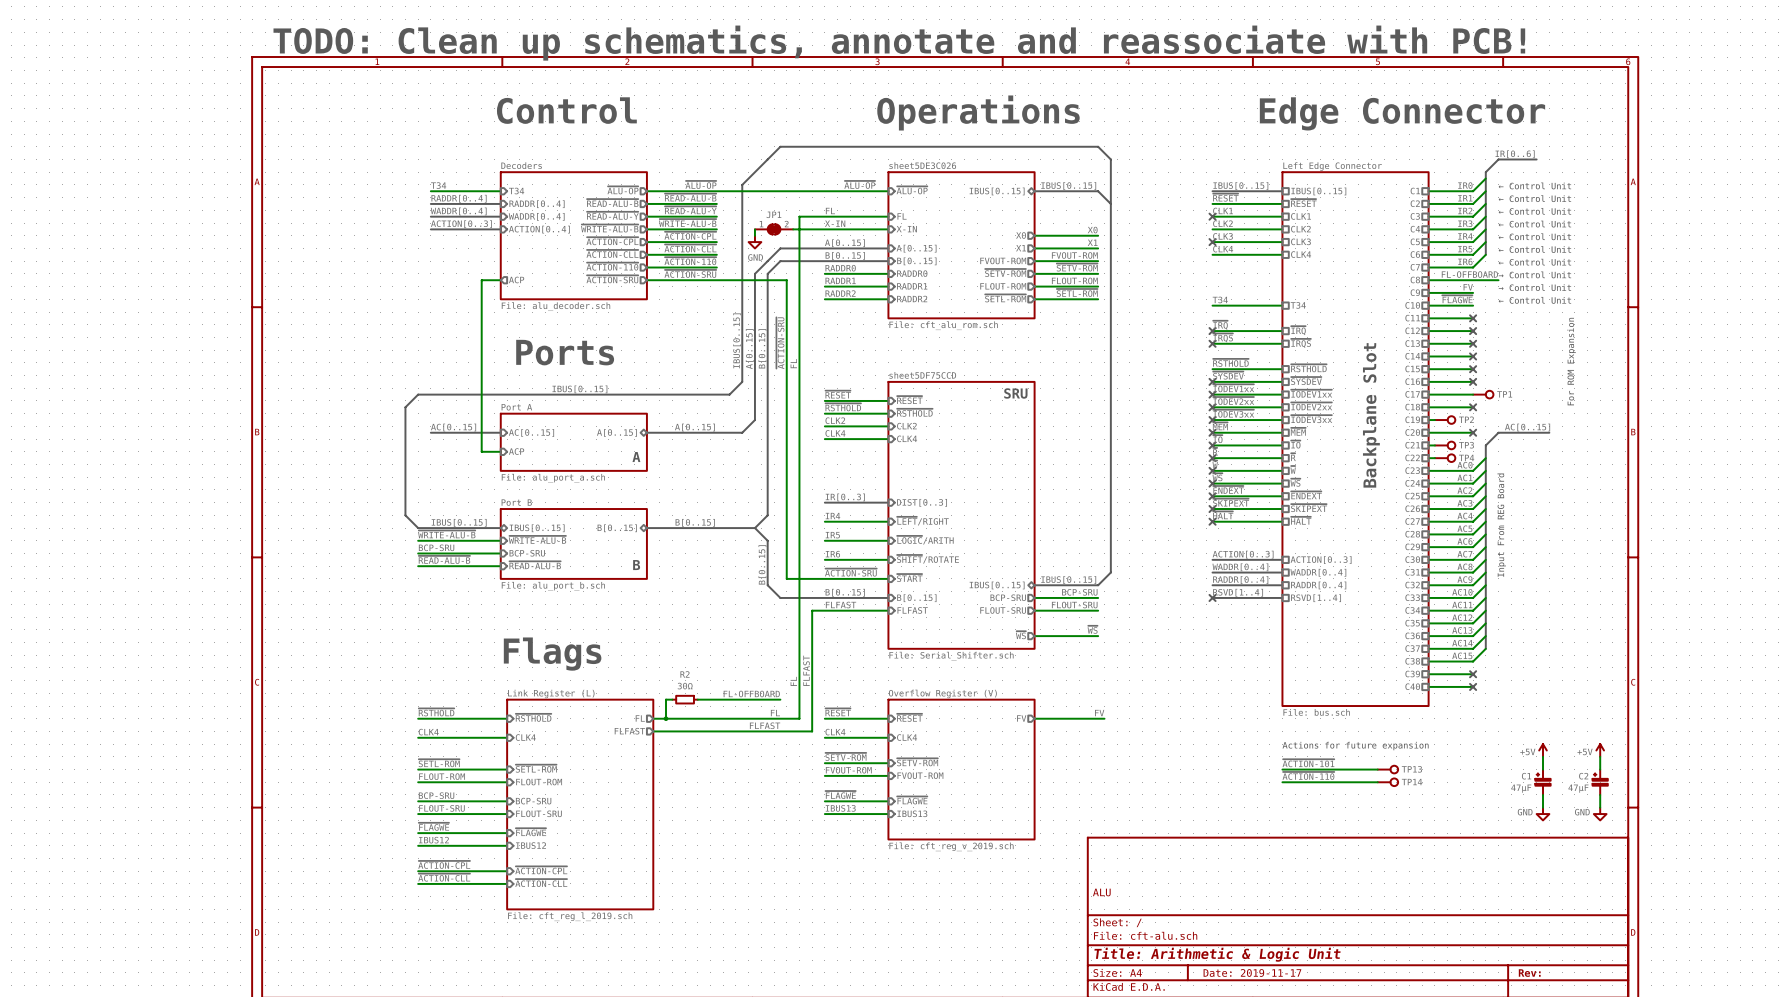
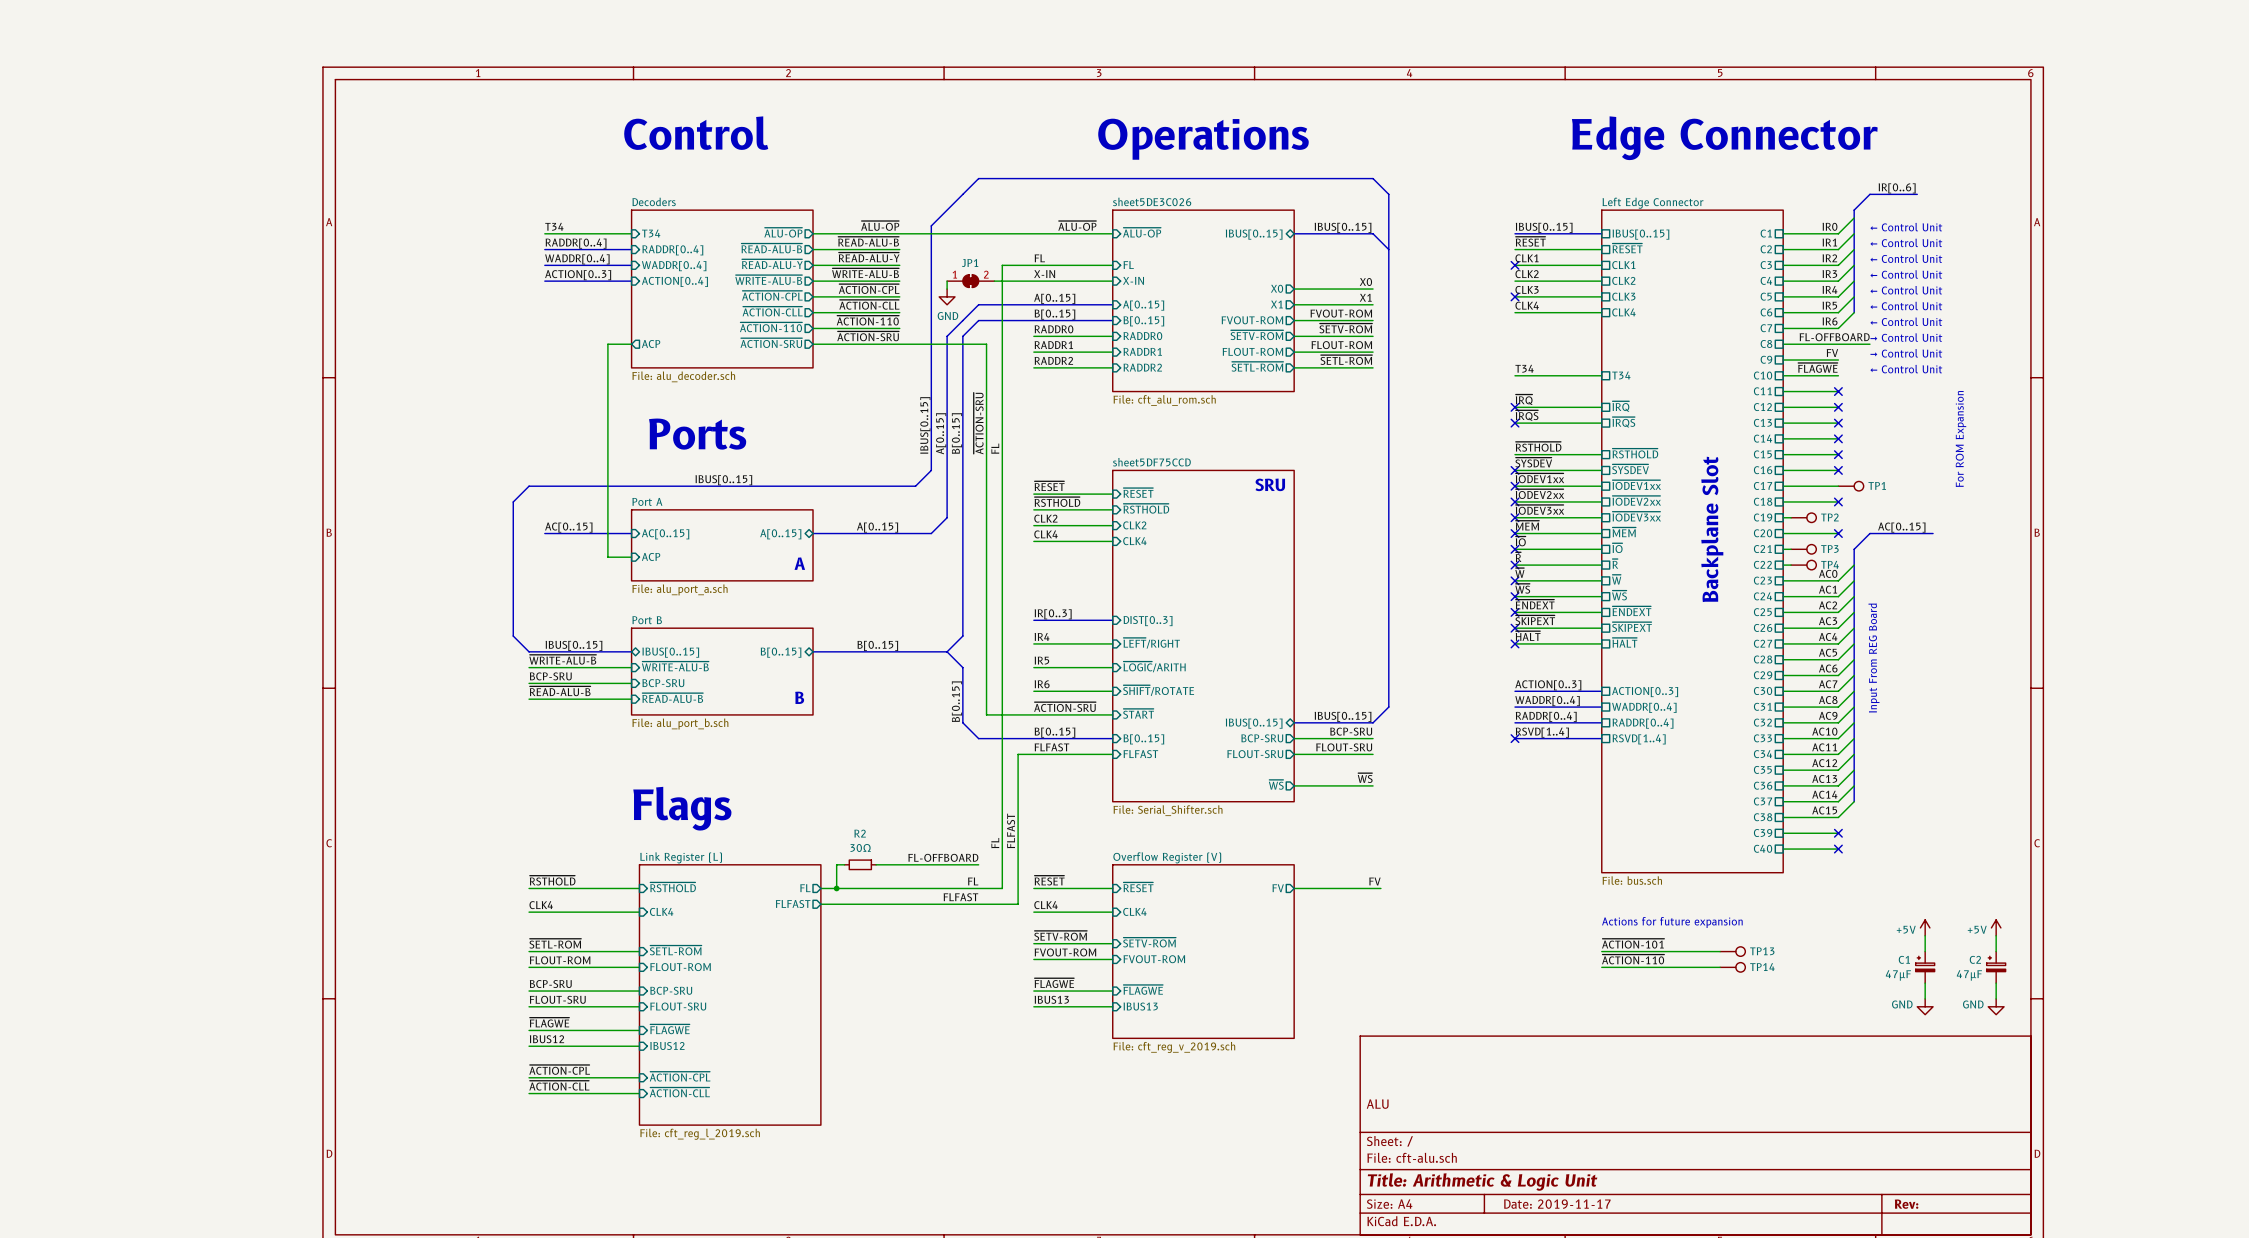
text: TODO: Clean up schematics, annotate and reassociate with PCB! (899, 43) -> none

